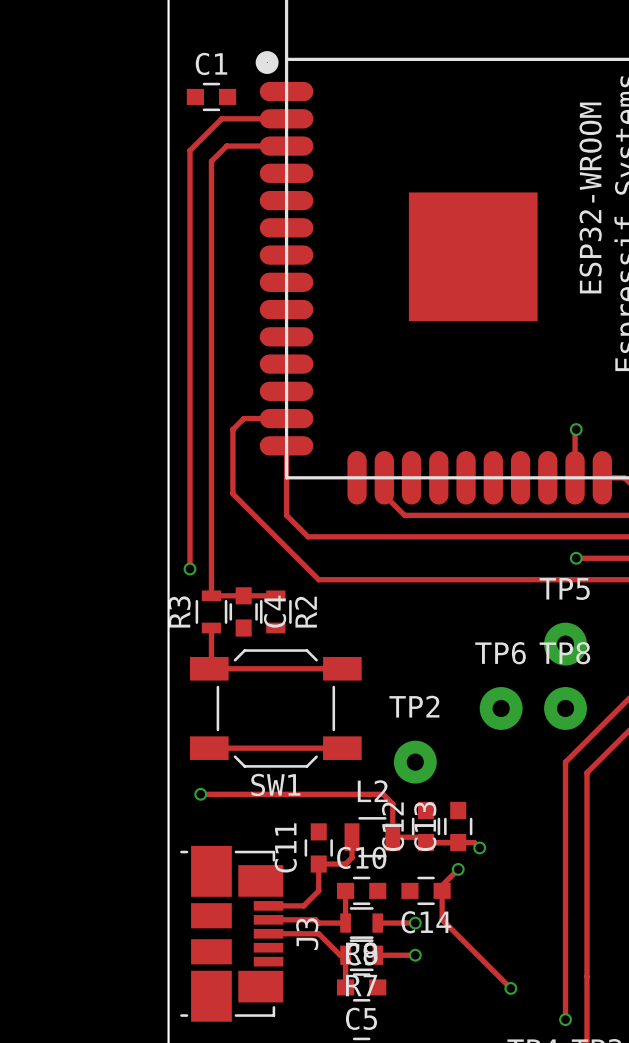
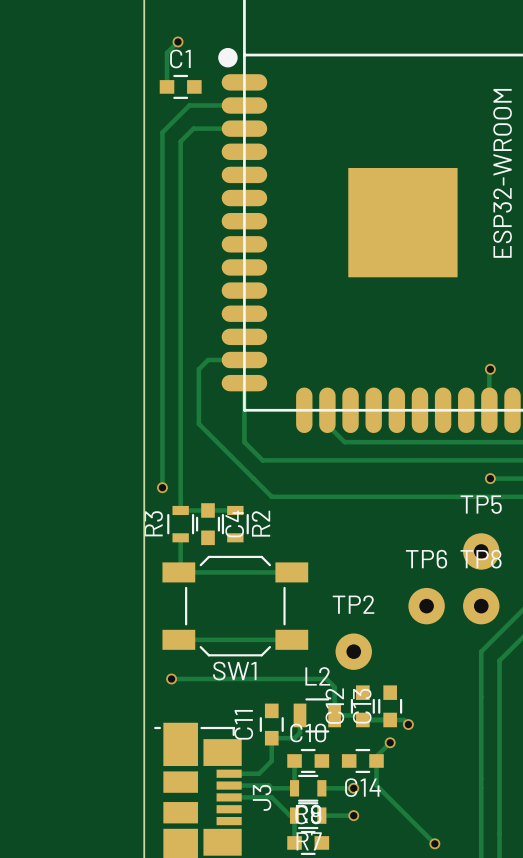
track: none -> (178, 41) (167, 52) (167, 86)
via: none -> (178, 41)

